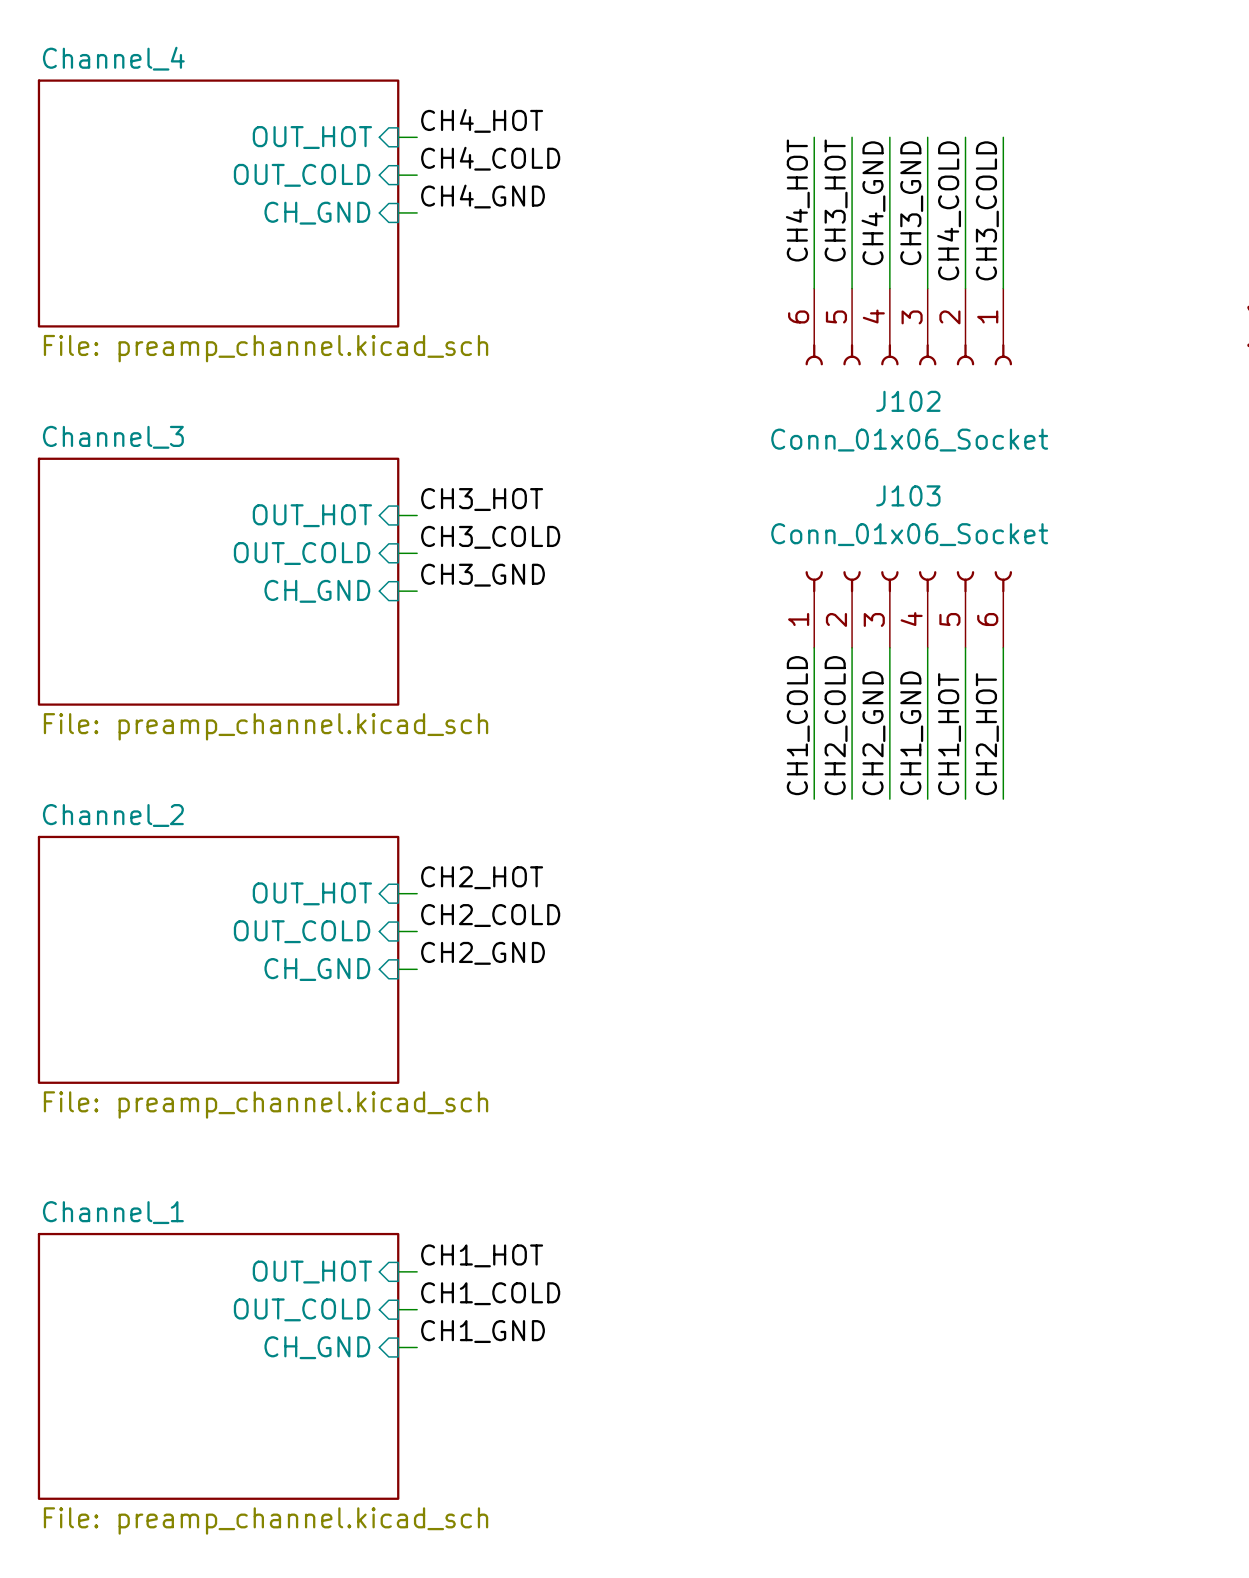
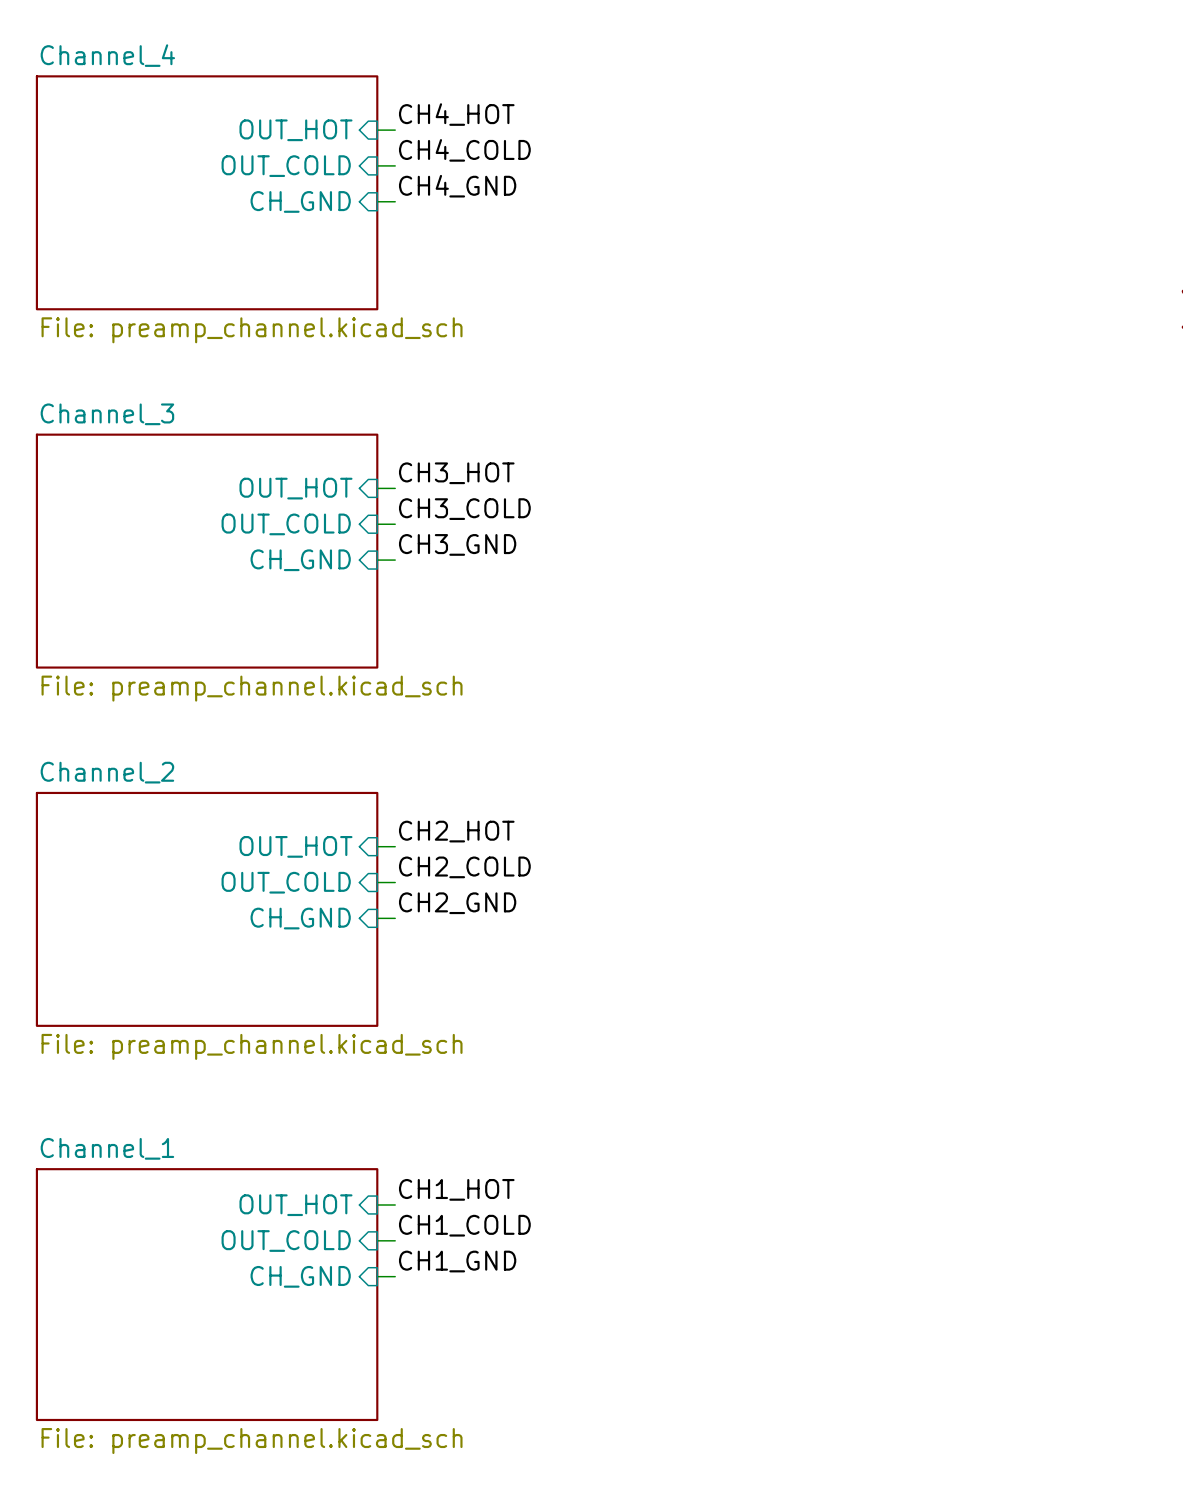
wire: (814, 137) (814, 288) -> none
wire: (852, 137) (852, 288) -> none
wire: (889, 137) (889, 288) -> none
wire: (927, 137) (927, 288) -> none
wire: (965, 137) (965, 288) -> none
wire: (1003, 137) (1003, 288) -> none
label: CH4_HOT (797, 200) -> none
label: CH3_HOT (836, 200) -> none
label: CH4_GND (873, 203) -> none
label: CH3_GND (911, 203) -> none
label: CH4_COLD (949, 210) -> none
label: CH3_COLD (987, 210) -> none
J102: Conn_01x06_Socket (908, 326) -> none
J103: Conn_01x06_Socket (908, 609) -> none
wire: (814, 647) (814, 799) -> none
wire: (852, 647) (852, 799) -> none
wire: (889, 647) (889, 799) -> none
wire: (927, 647) (927, 799) -> none
wire: (965, 647) (965, 799) -> none
wire: (1003, 647) (1003, 799) -> none
label: CH1_COLD (798, 725) -> none
label: CH2_COLD (836, 725) -> none
label: CH2_GND (873, 733) -> none
label: CH1_GND (911, 733) -> none
label: CH1_HOT (949, 734) -> none
label: CH2_HOT (987, 734) -> none

